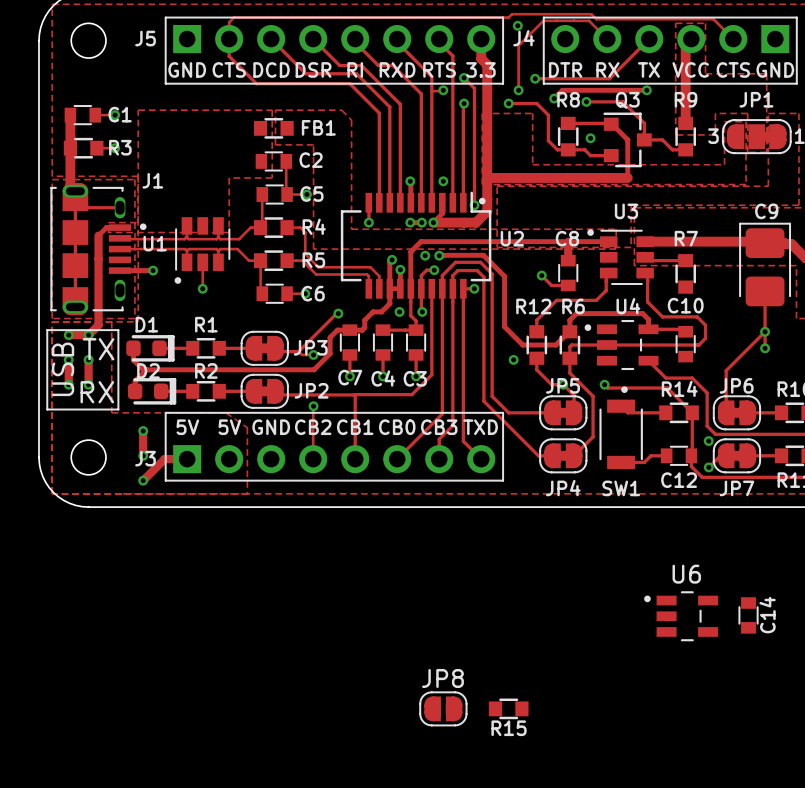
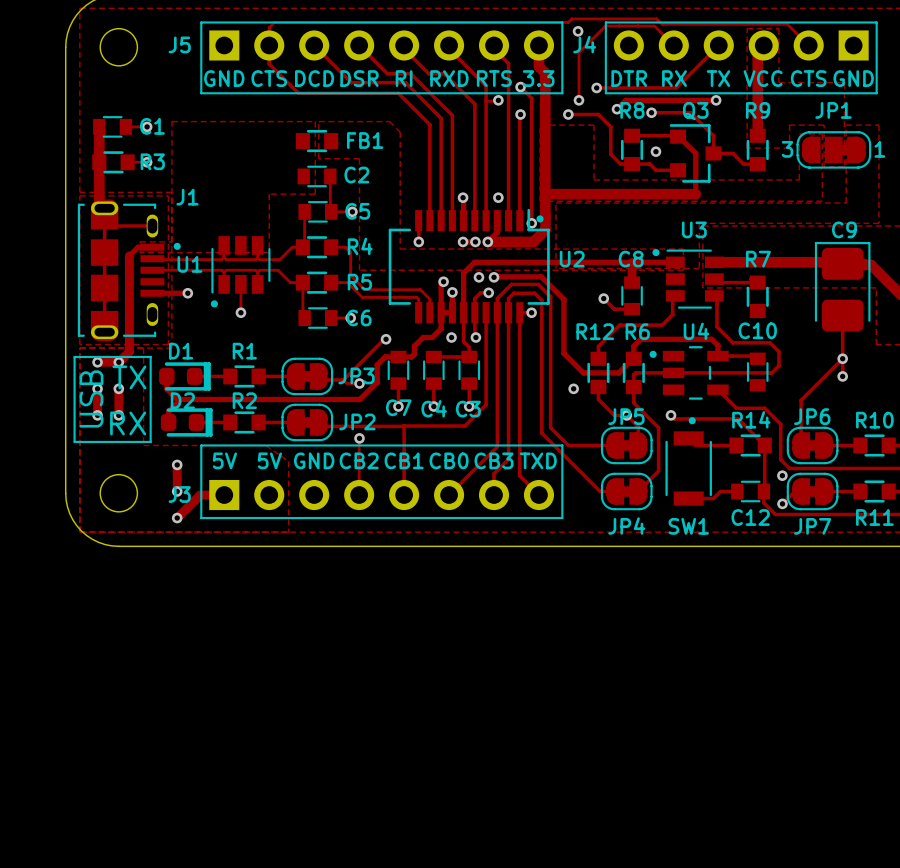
C14: (748, 615) -> none
U6: (681, 616) -> none
JP8: (443, 708) -> none
R15: (508, 708) -> none

